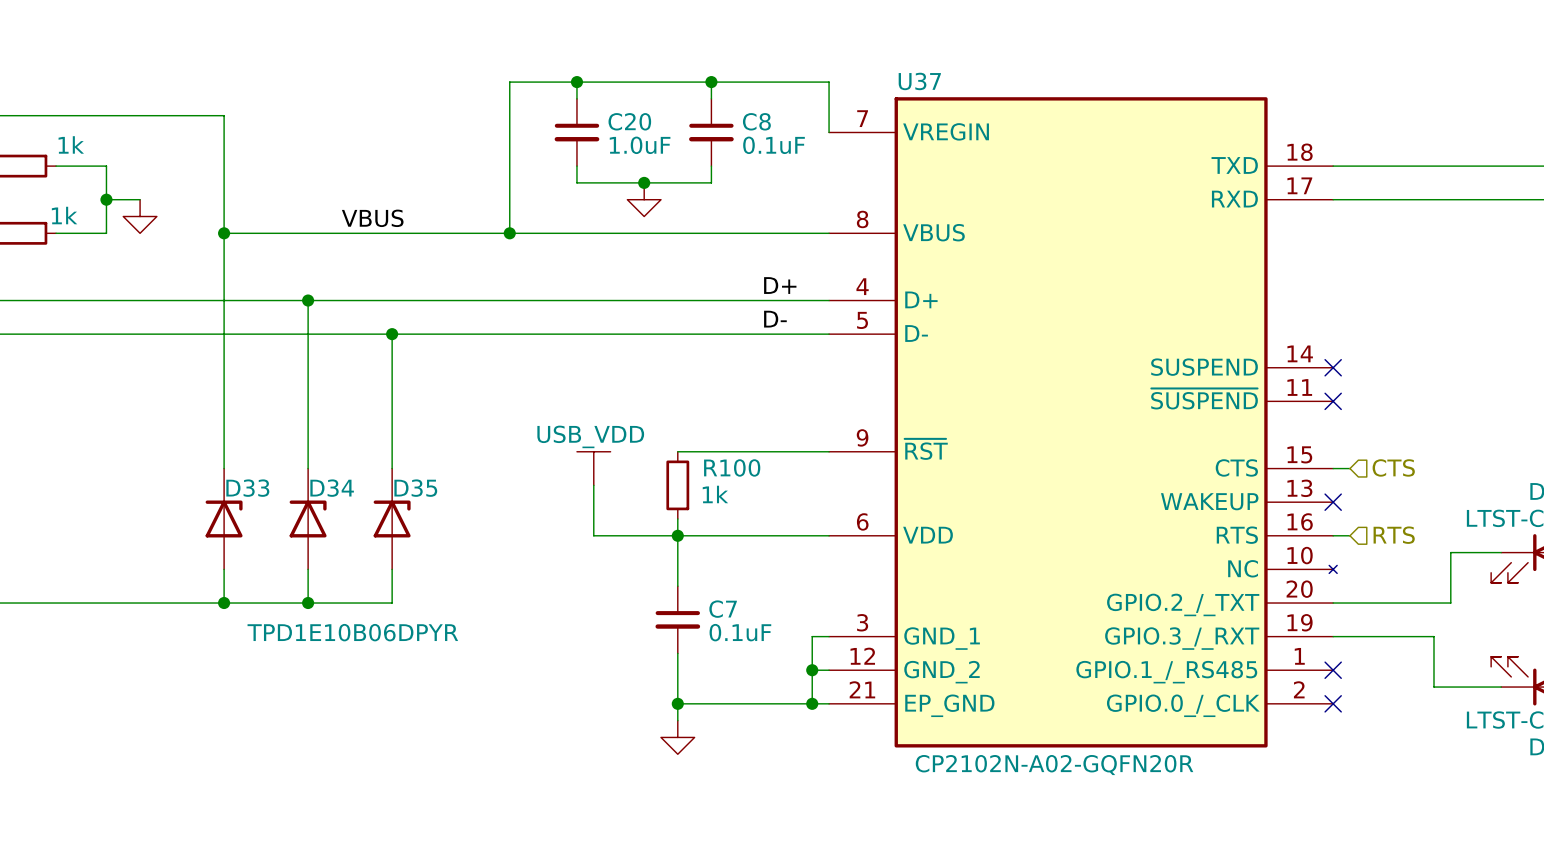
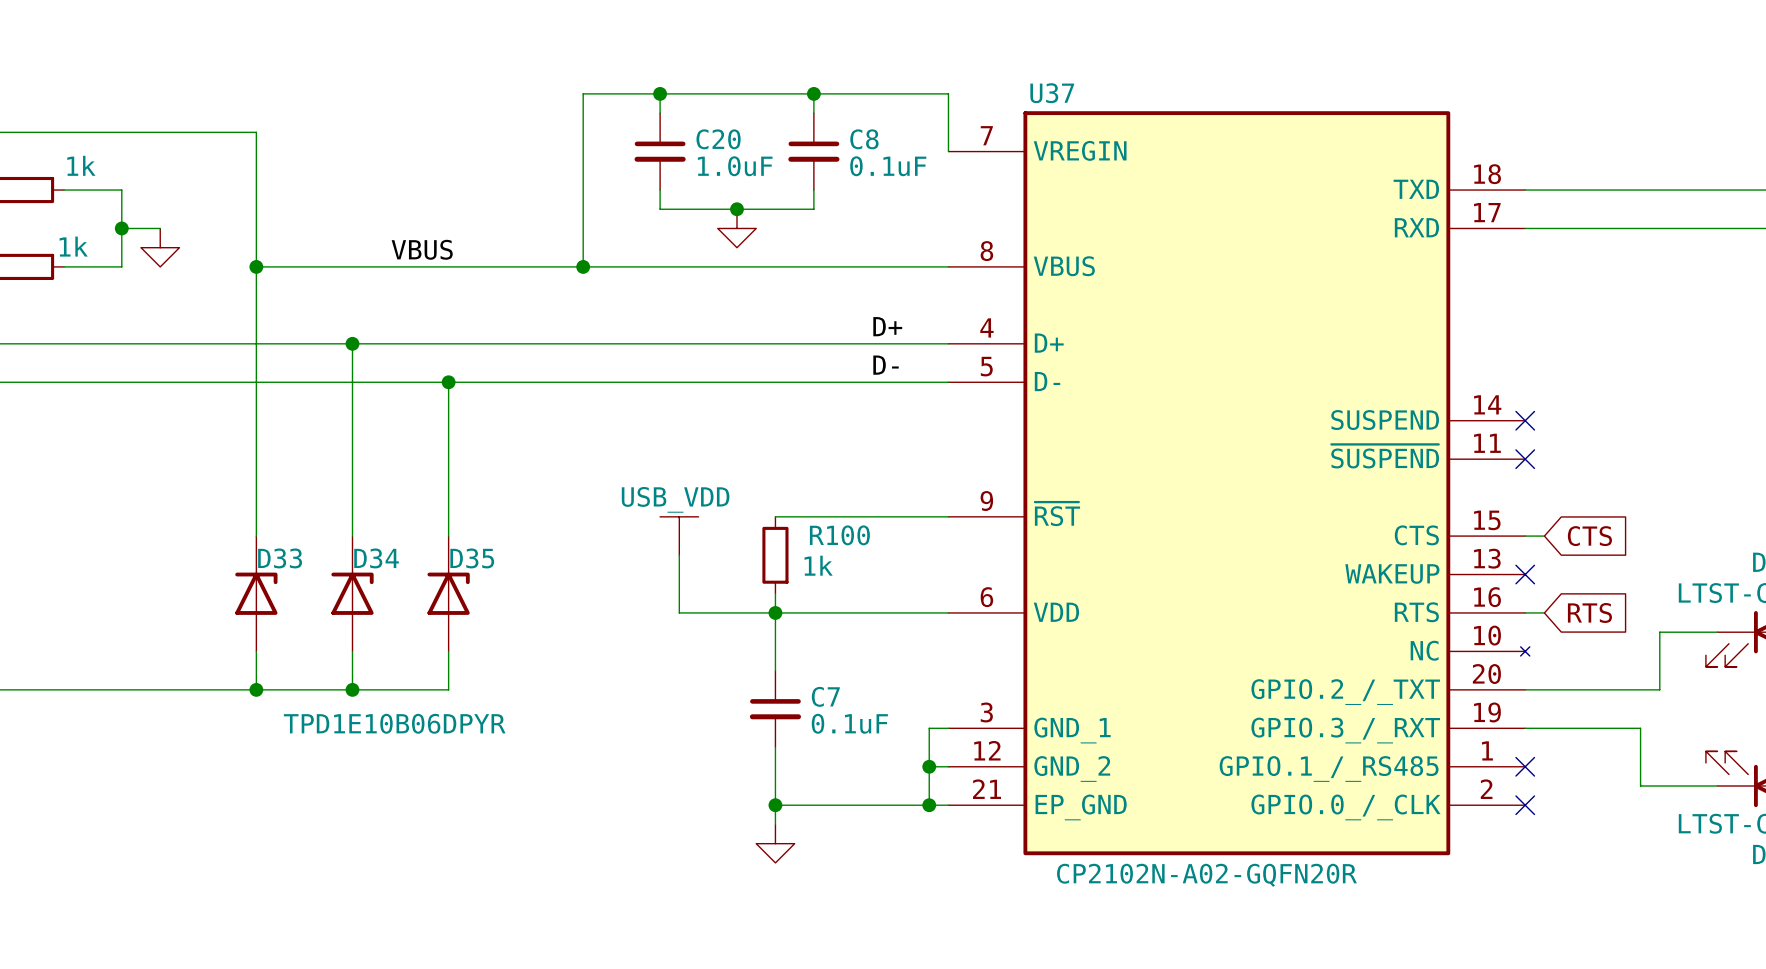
hierarchical label: CTS (1393, 467) -> none
global label: none -> CTS (1589, 536)
global label: none -> RTS (1589, 612)
hierarchical label: RTS (1394, 535) -> none

